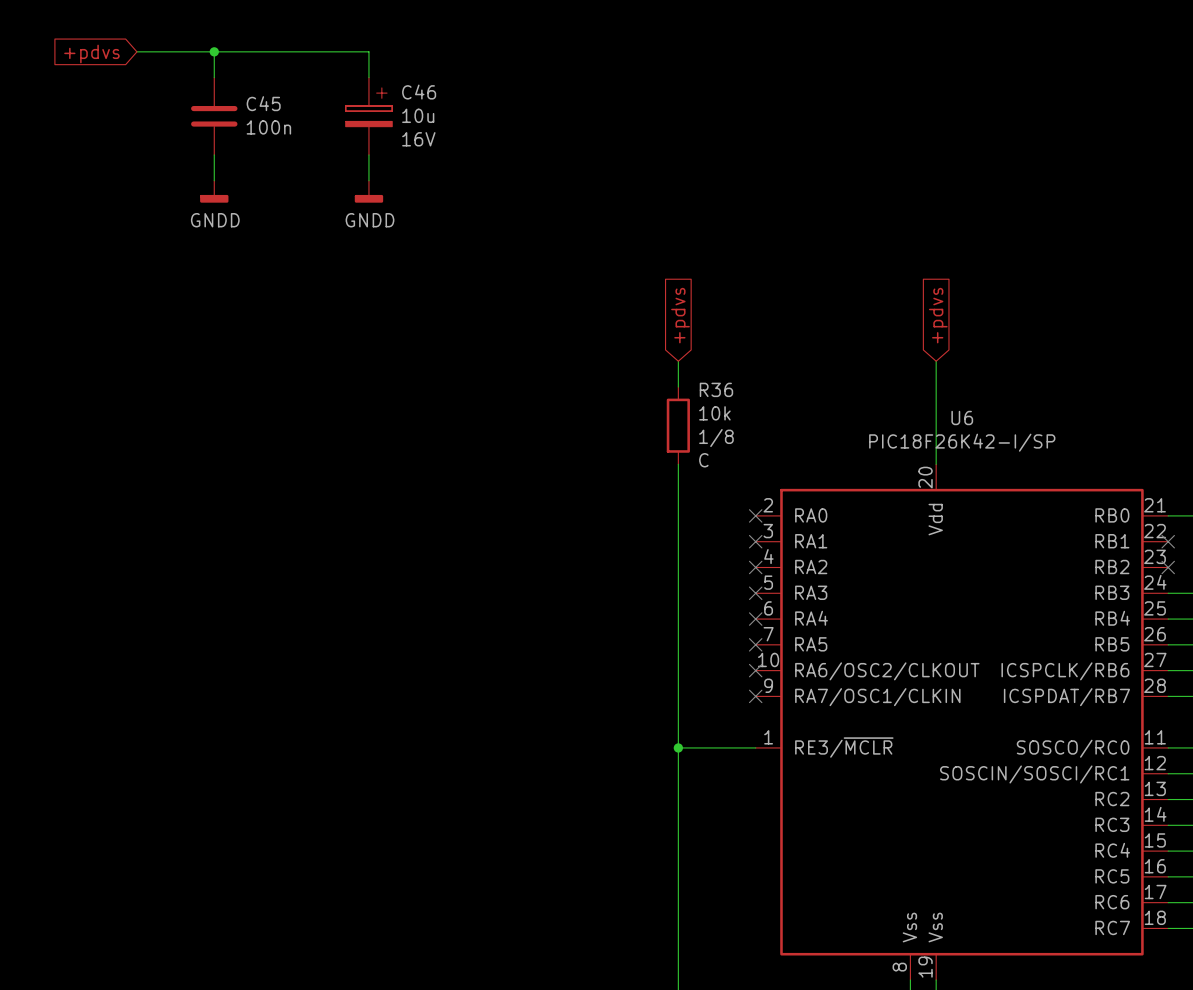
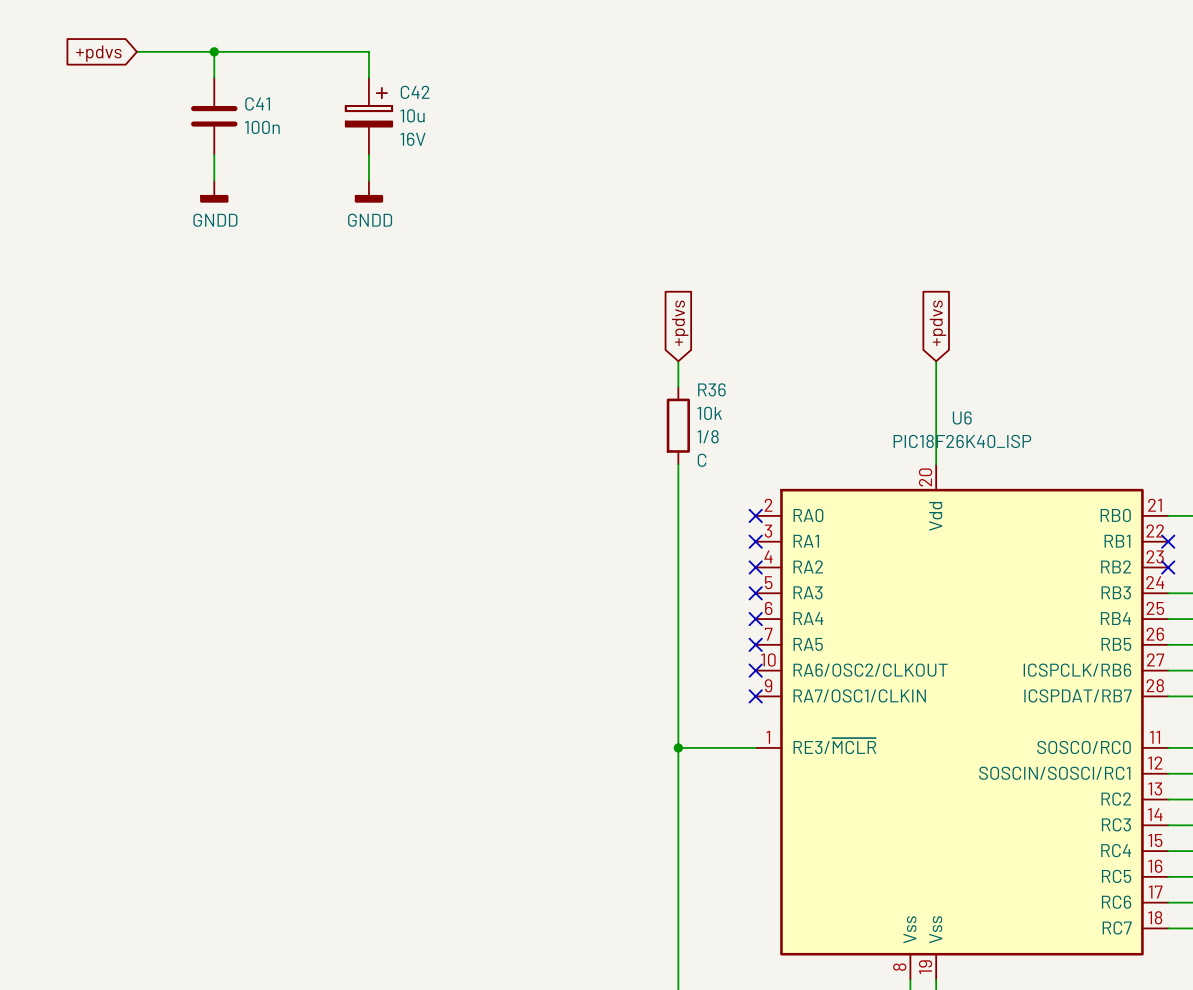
C46 name: C46 (419, 92) -> C42 (415, 92)
C45 name: C45 (263, 103) -> C41 (257, 103)
U6 value: PIC18F26K42-I/SP (962, 442) -> PIC18F26K40_ISP (962, 441)

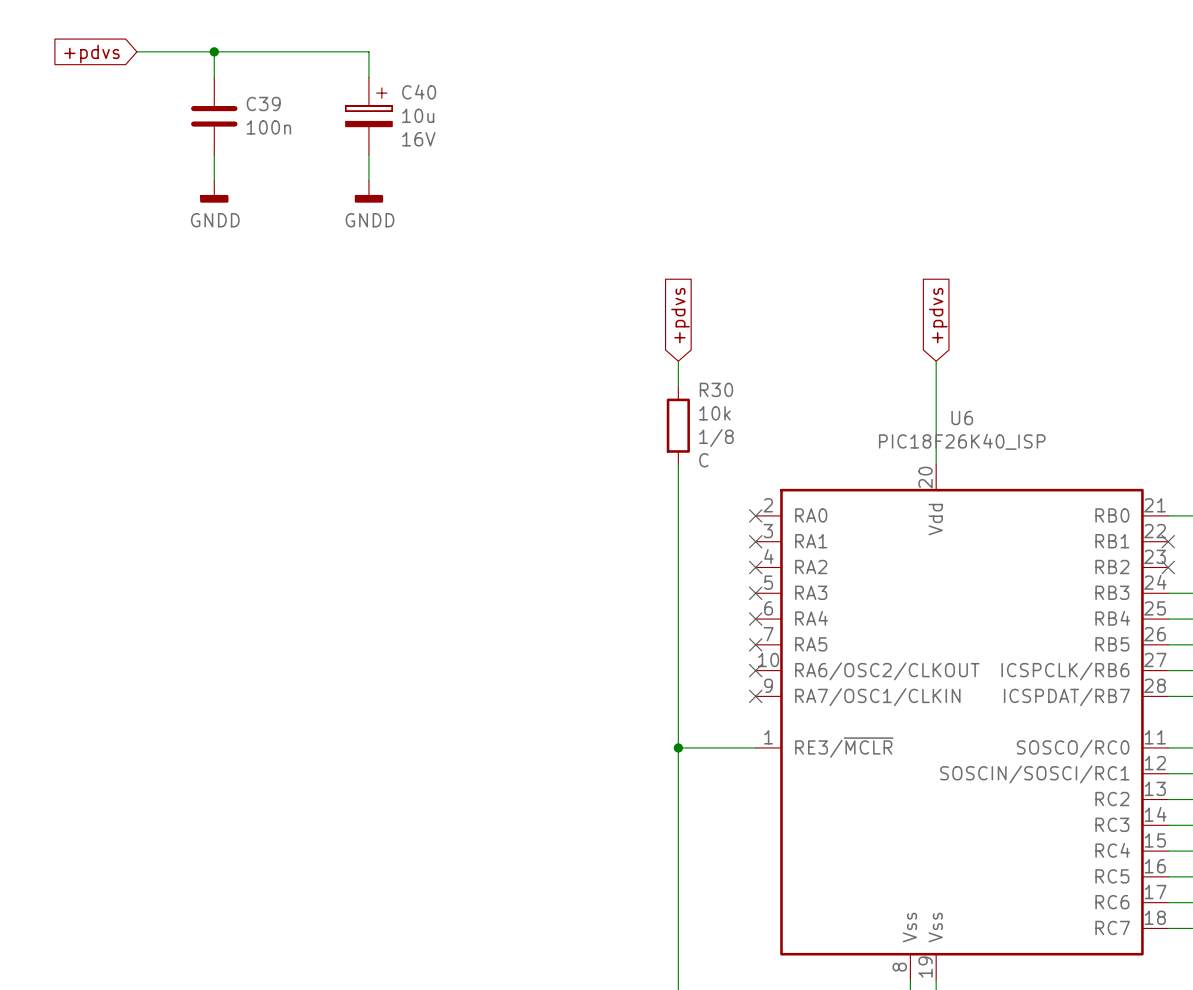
C42 name: C42 (415, 92) -> C40 (419, 92)
C41 name: C41 (257, 103) -> C39 (263, 103)
R36 name: R36 (711, 389) -> R30 (716, 389)

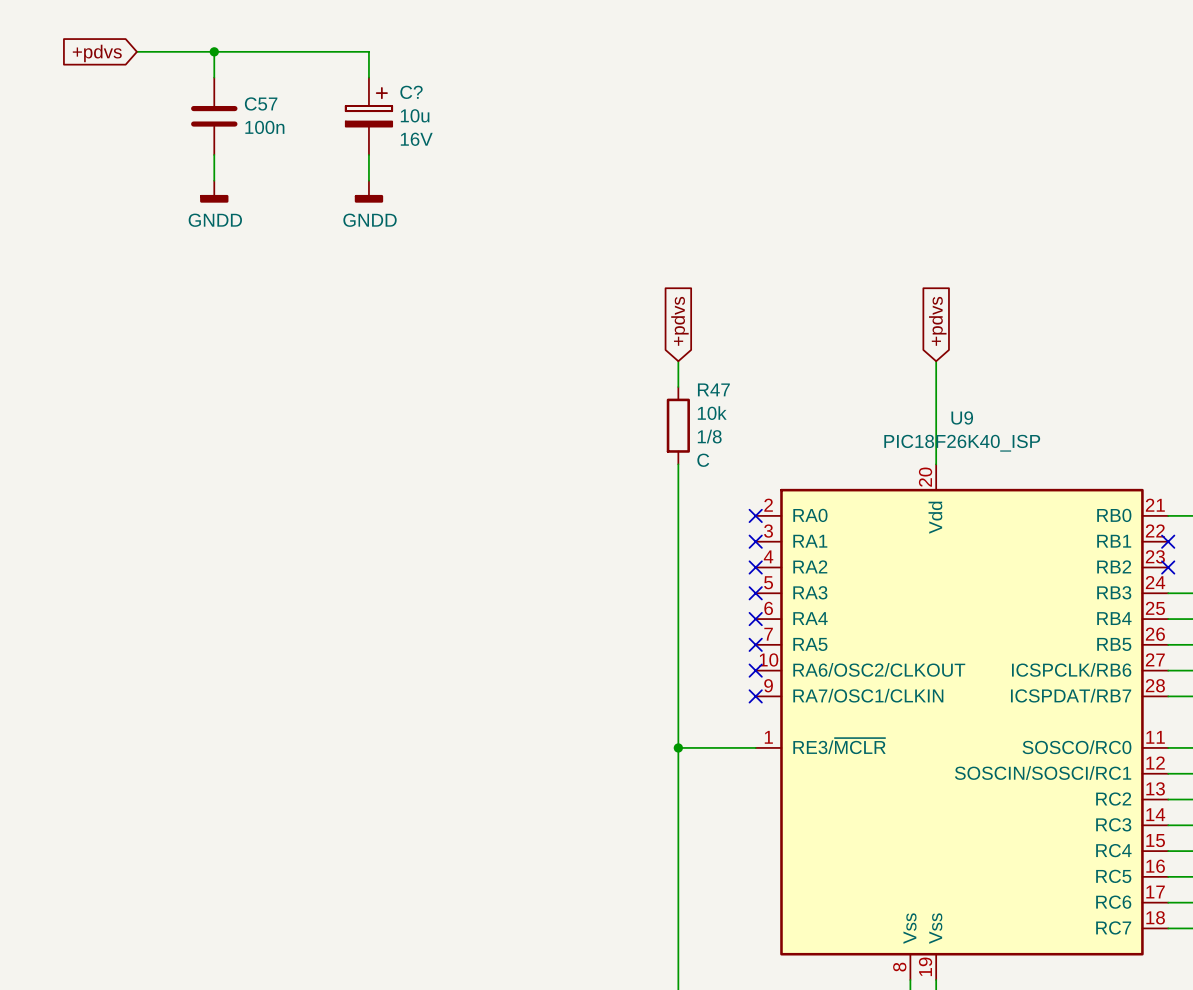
C40 name: C40 (419, 92) -> C? (411, 92)
C39 name: C39 (263, 103) -> C57 (261, 103)
R30 name: R30 (716, 389) -> R47 (713, 389)
U6 name: U6 (962, 417) -> U9 (962, 417)

